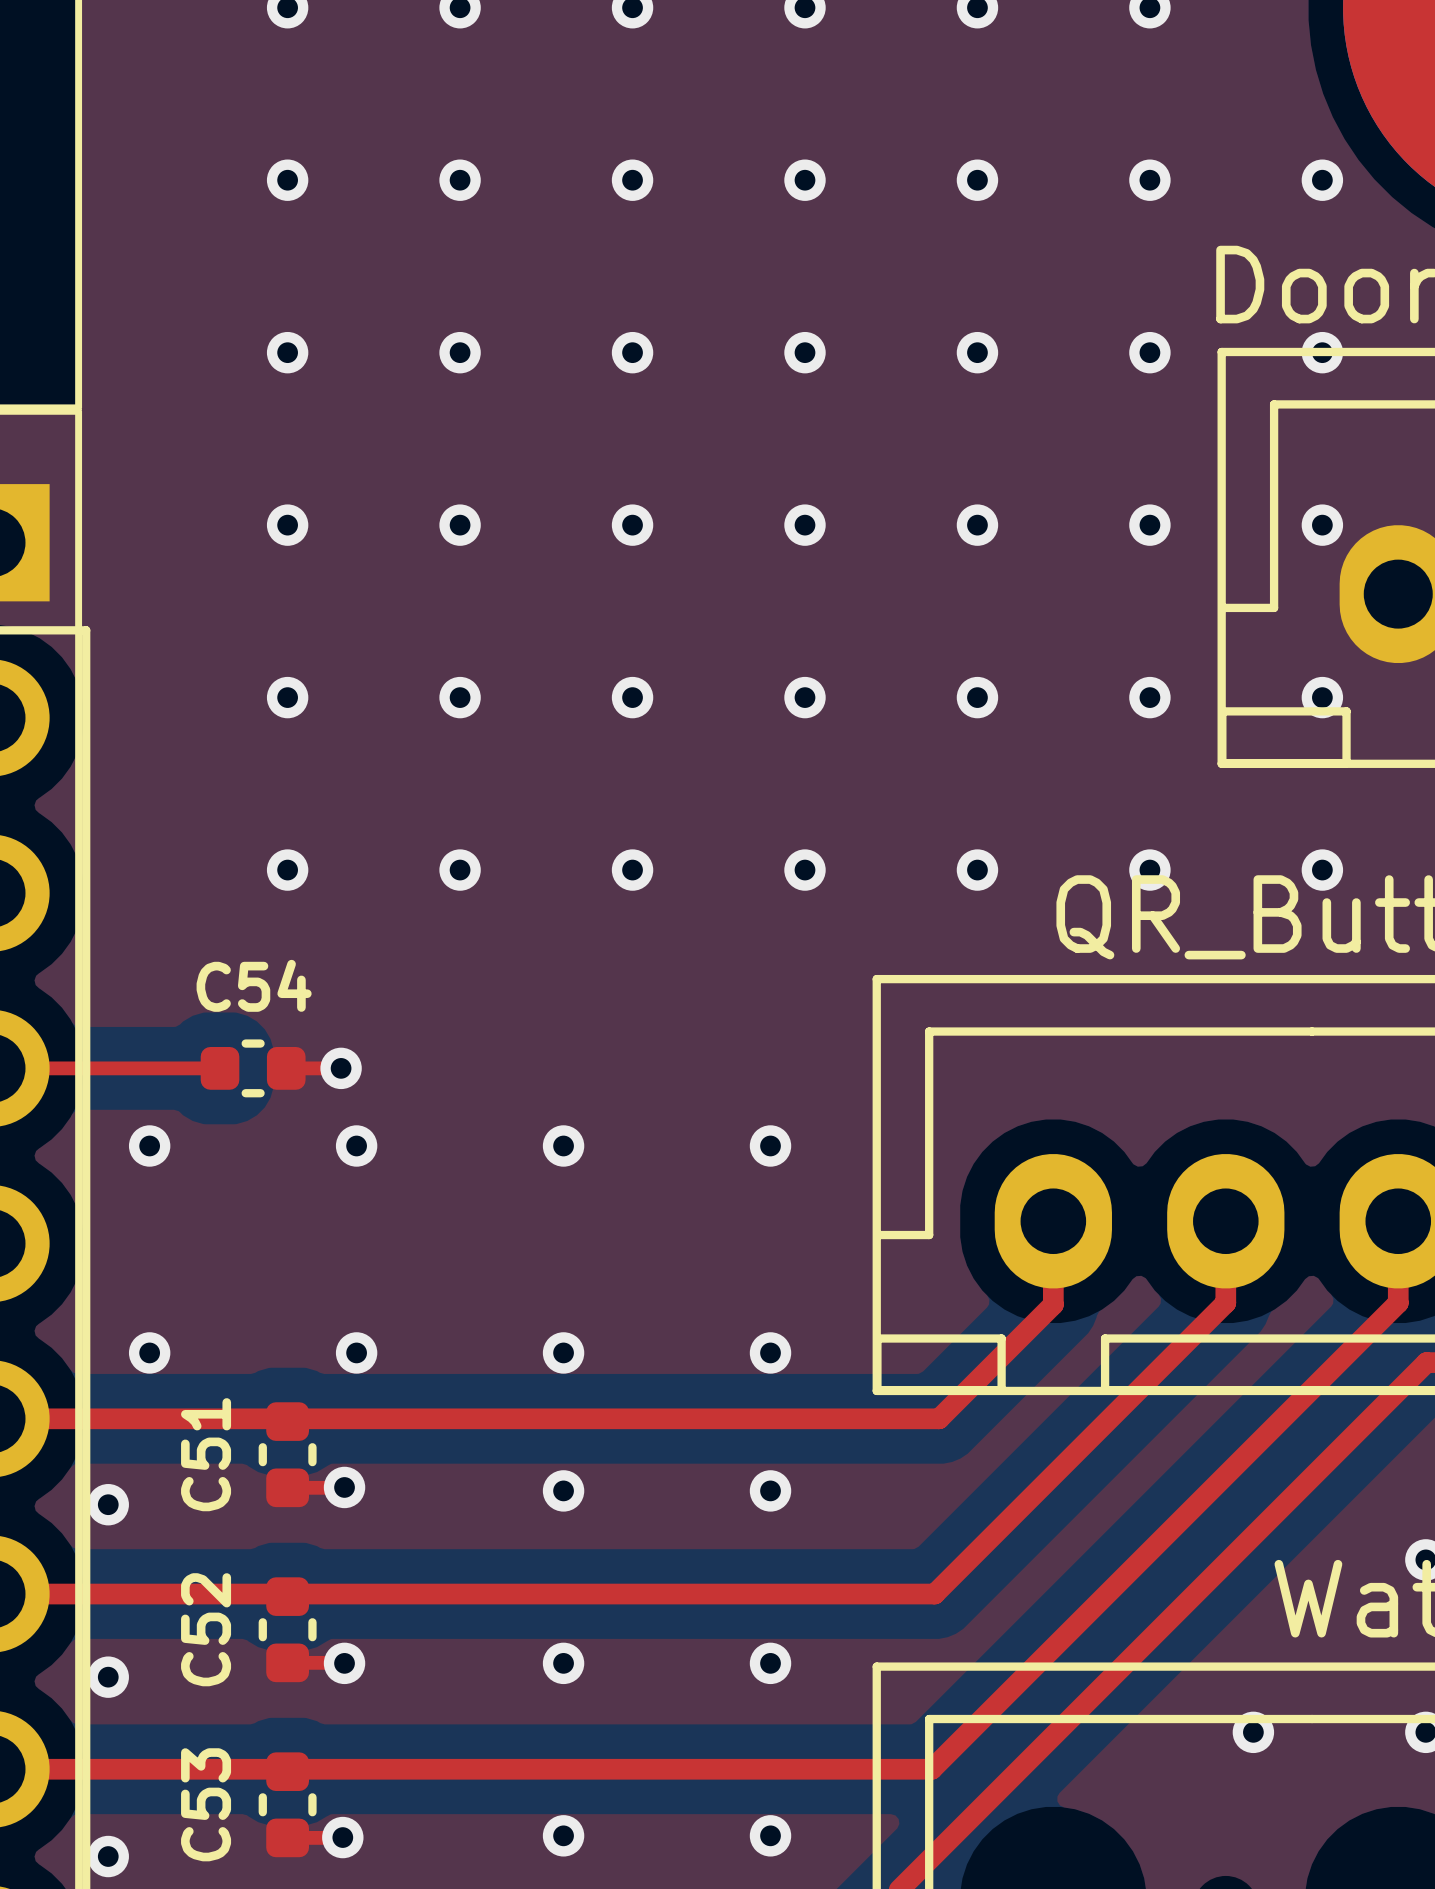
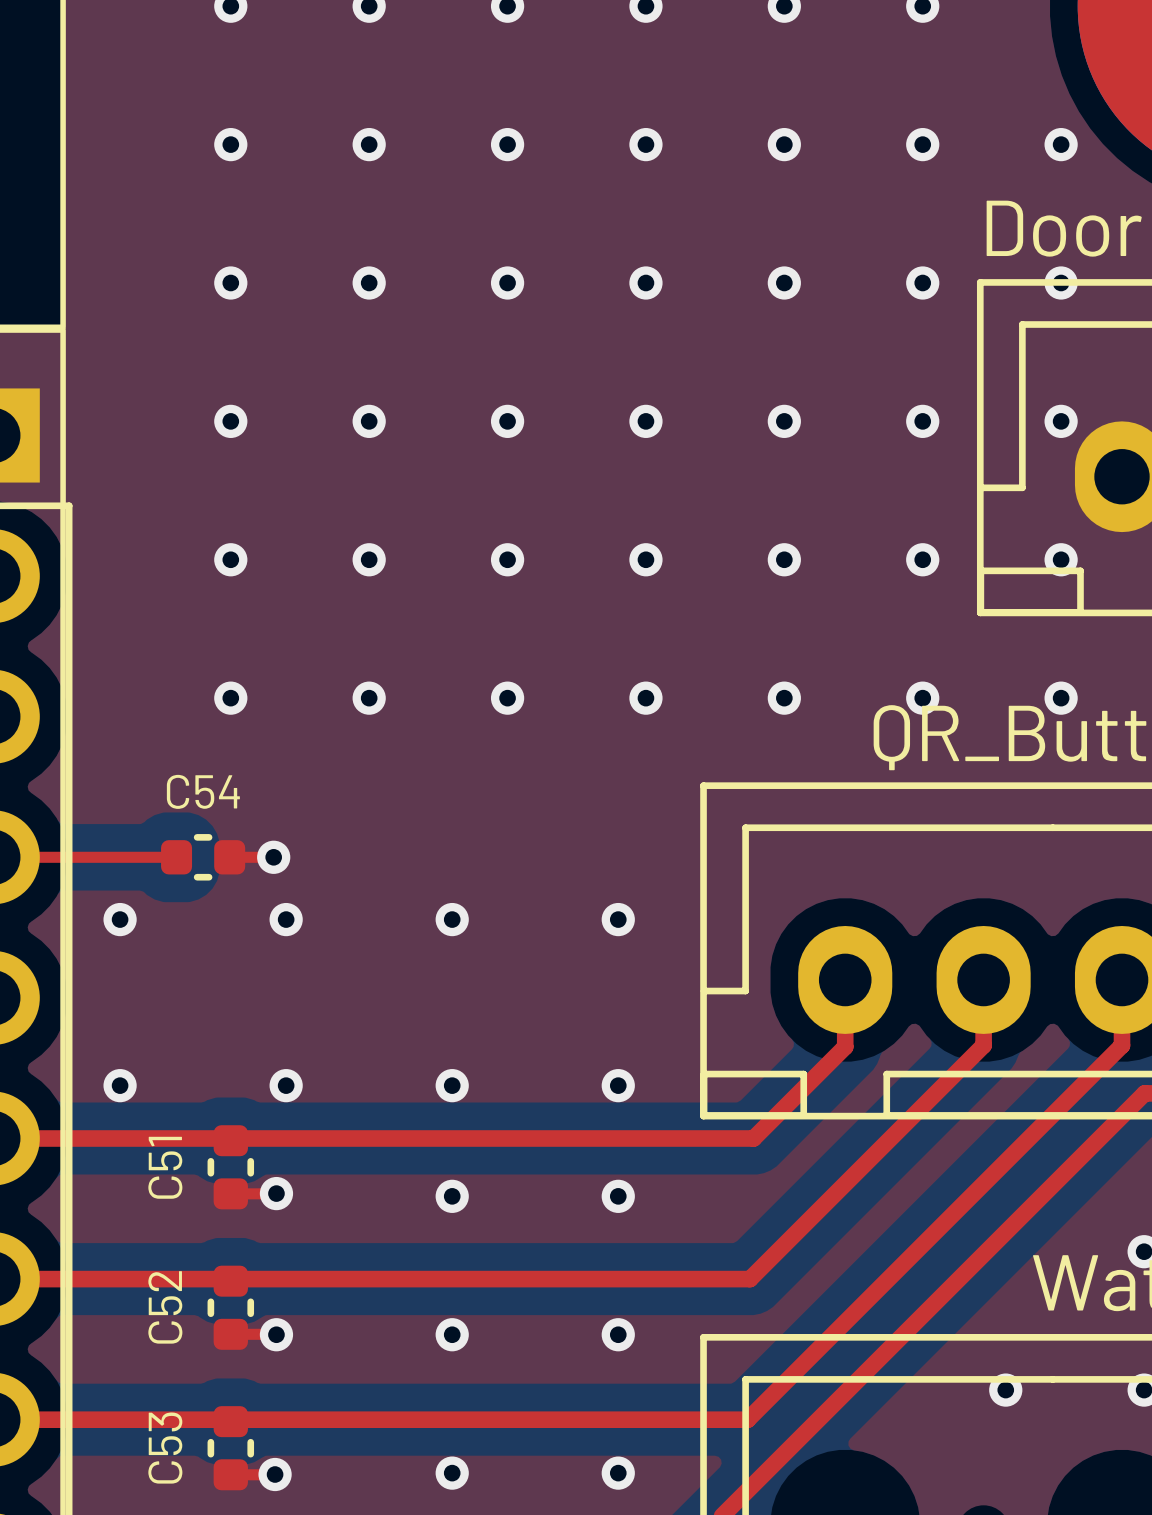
via: (108, 1504) -> none
via: (108, 1677) -> none
via: (108, 1856) -> none

